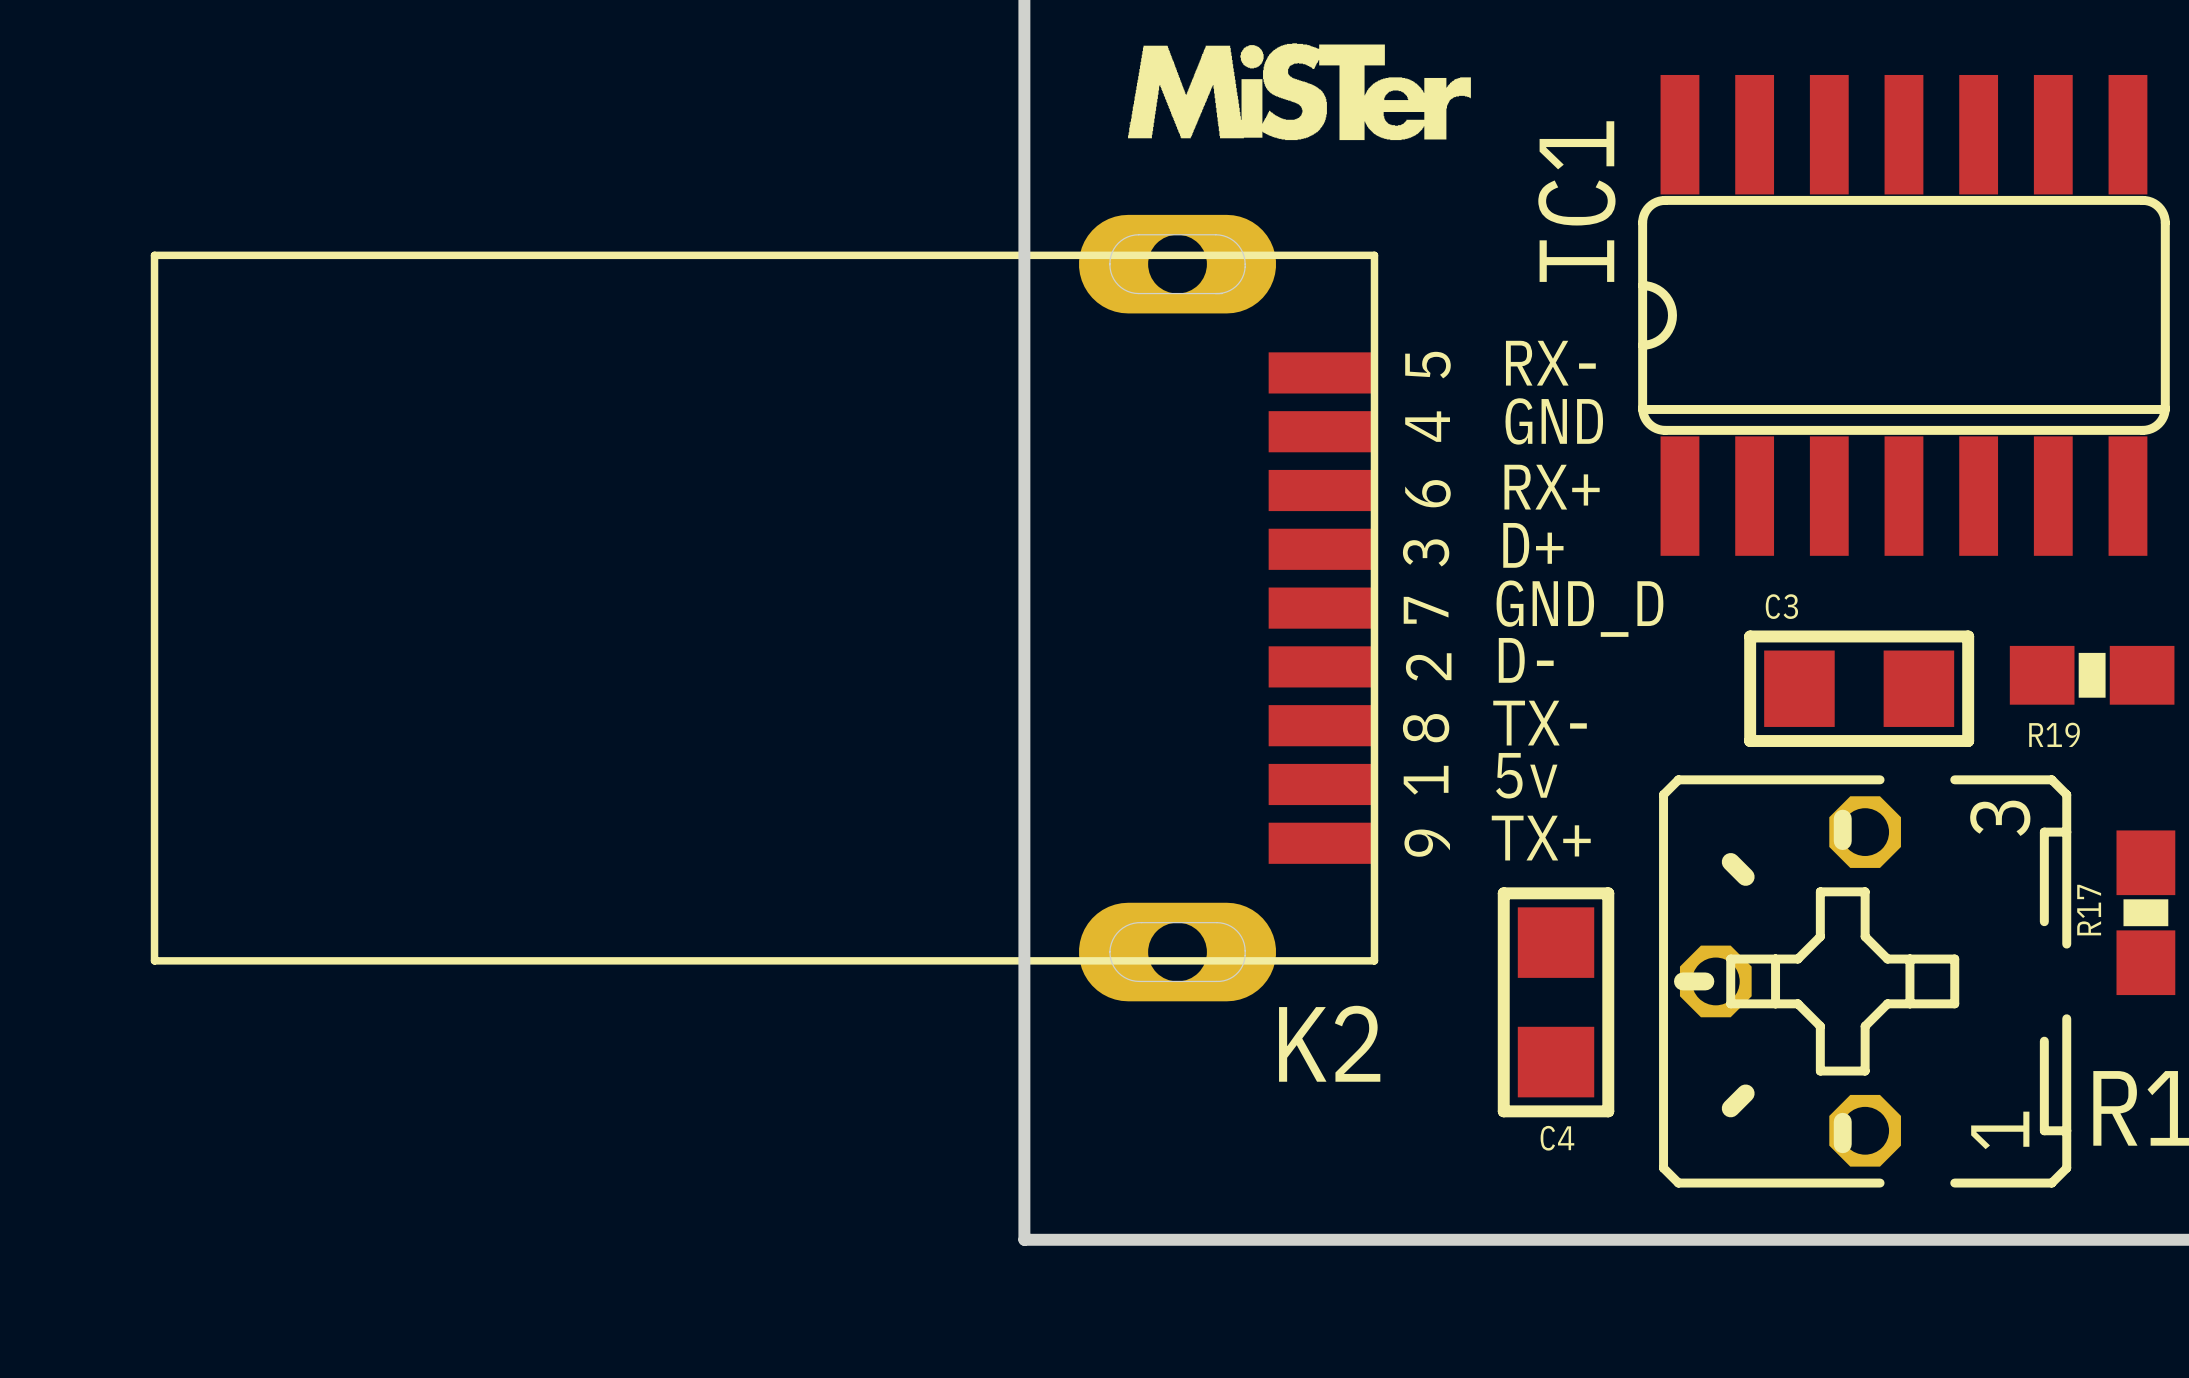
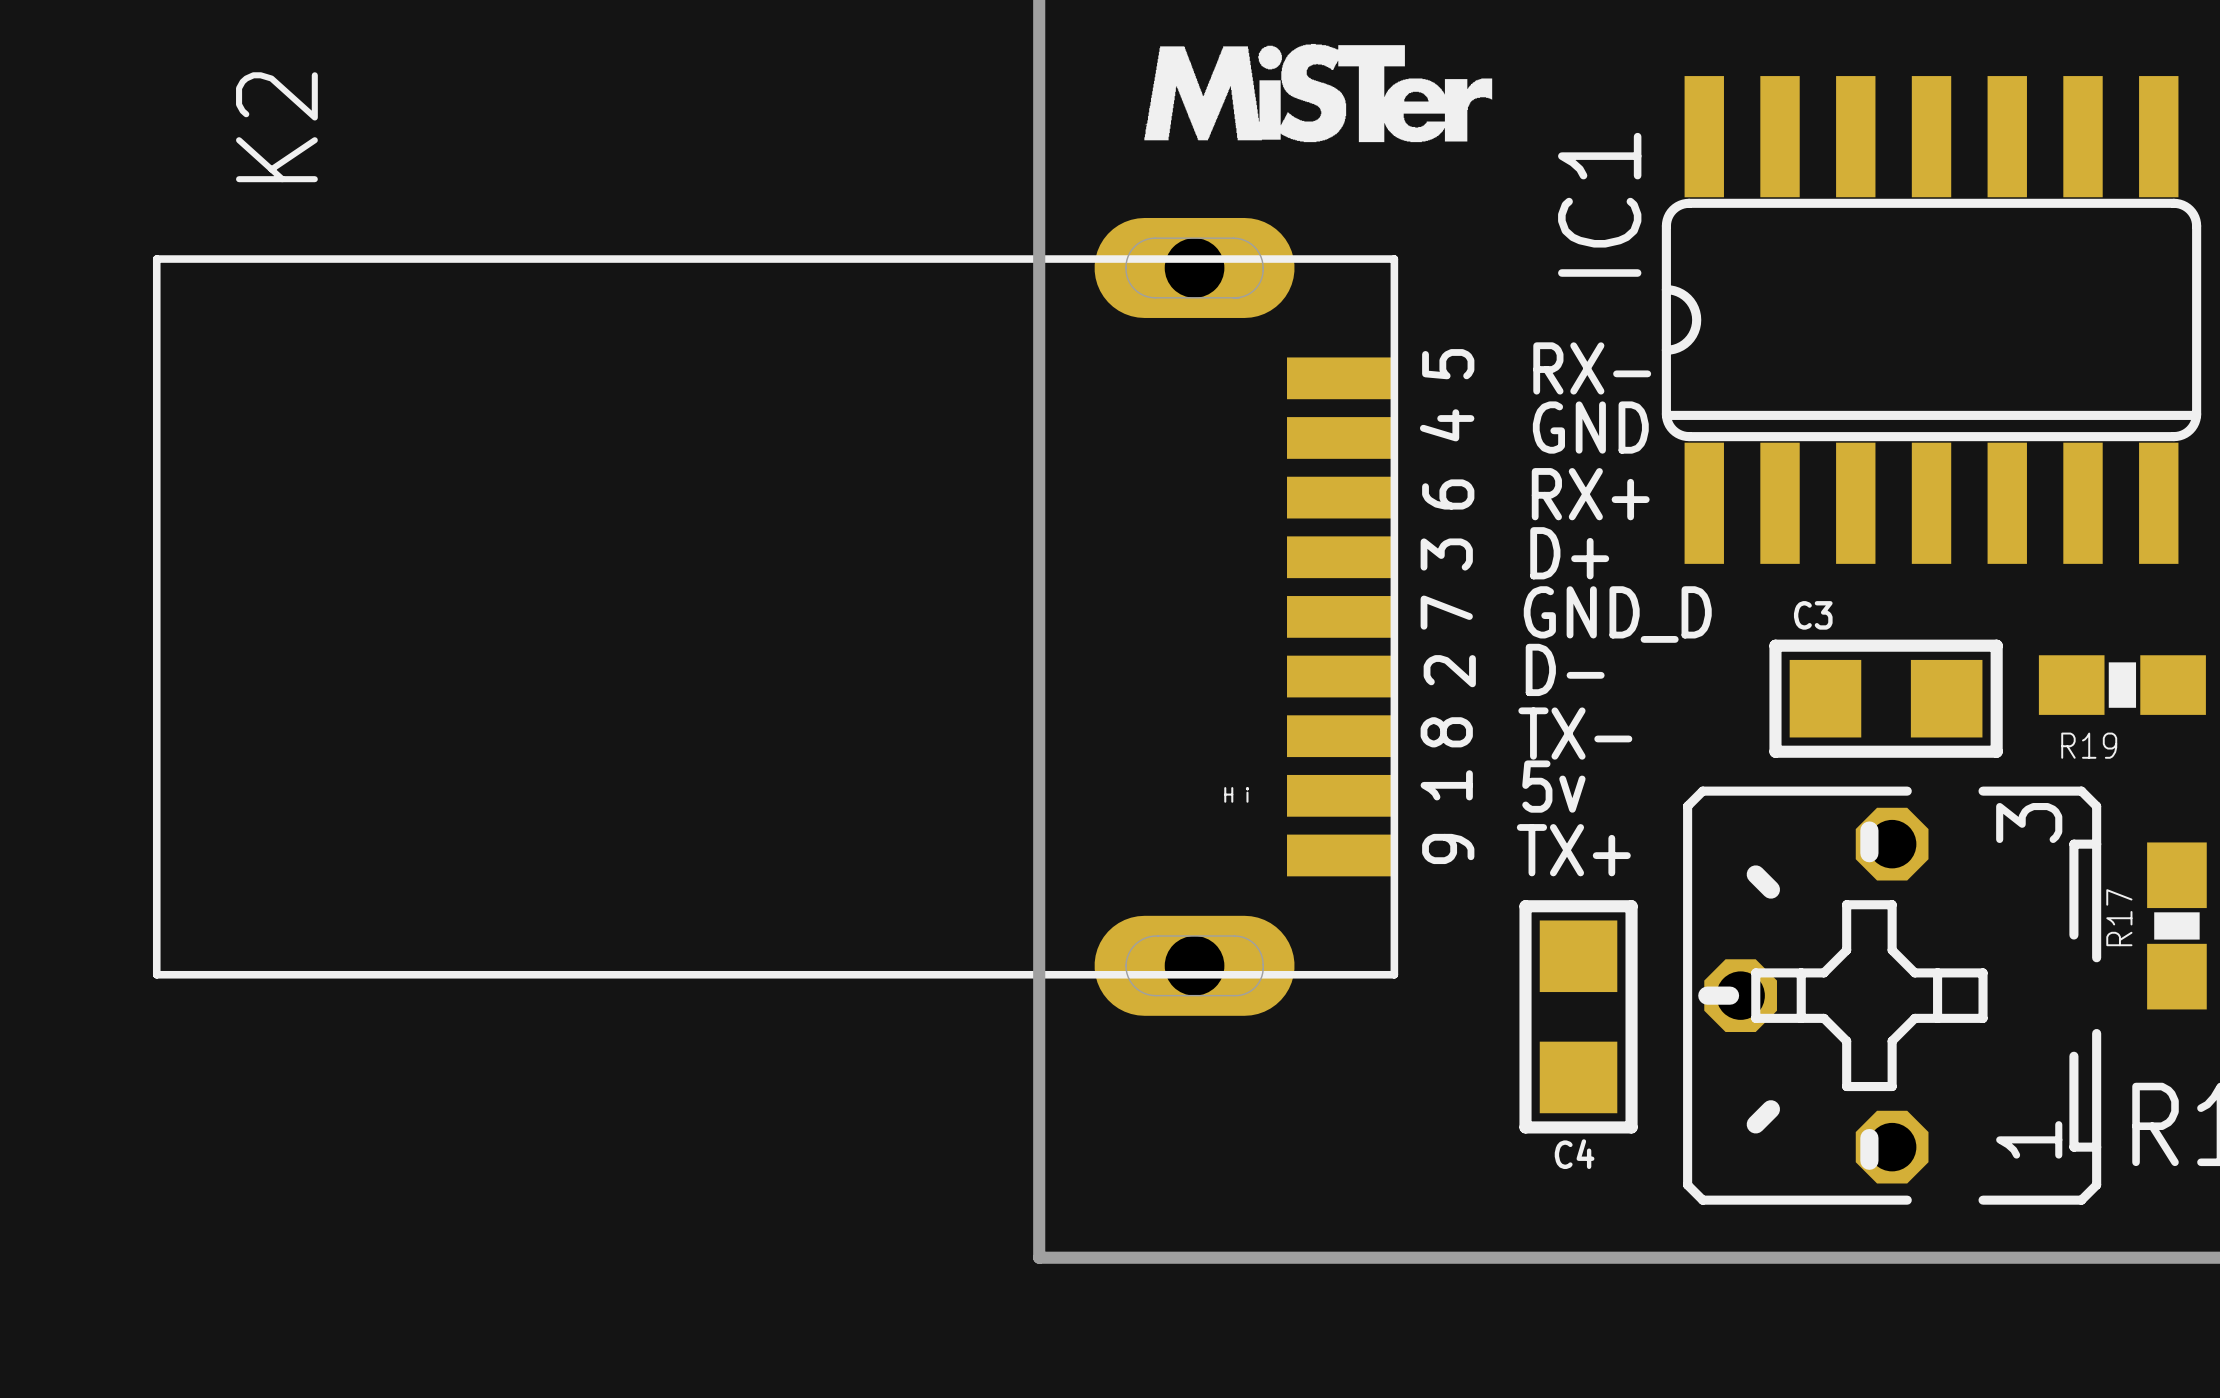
text: none -> H i (1236, 794)
K2 name rotation: 0° (1329, 1043) -> 90° counterclockwise (276, 127)
K2 name position: K2 (1329, 1043) -> K2 (276, 127)

